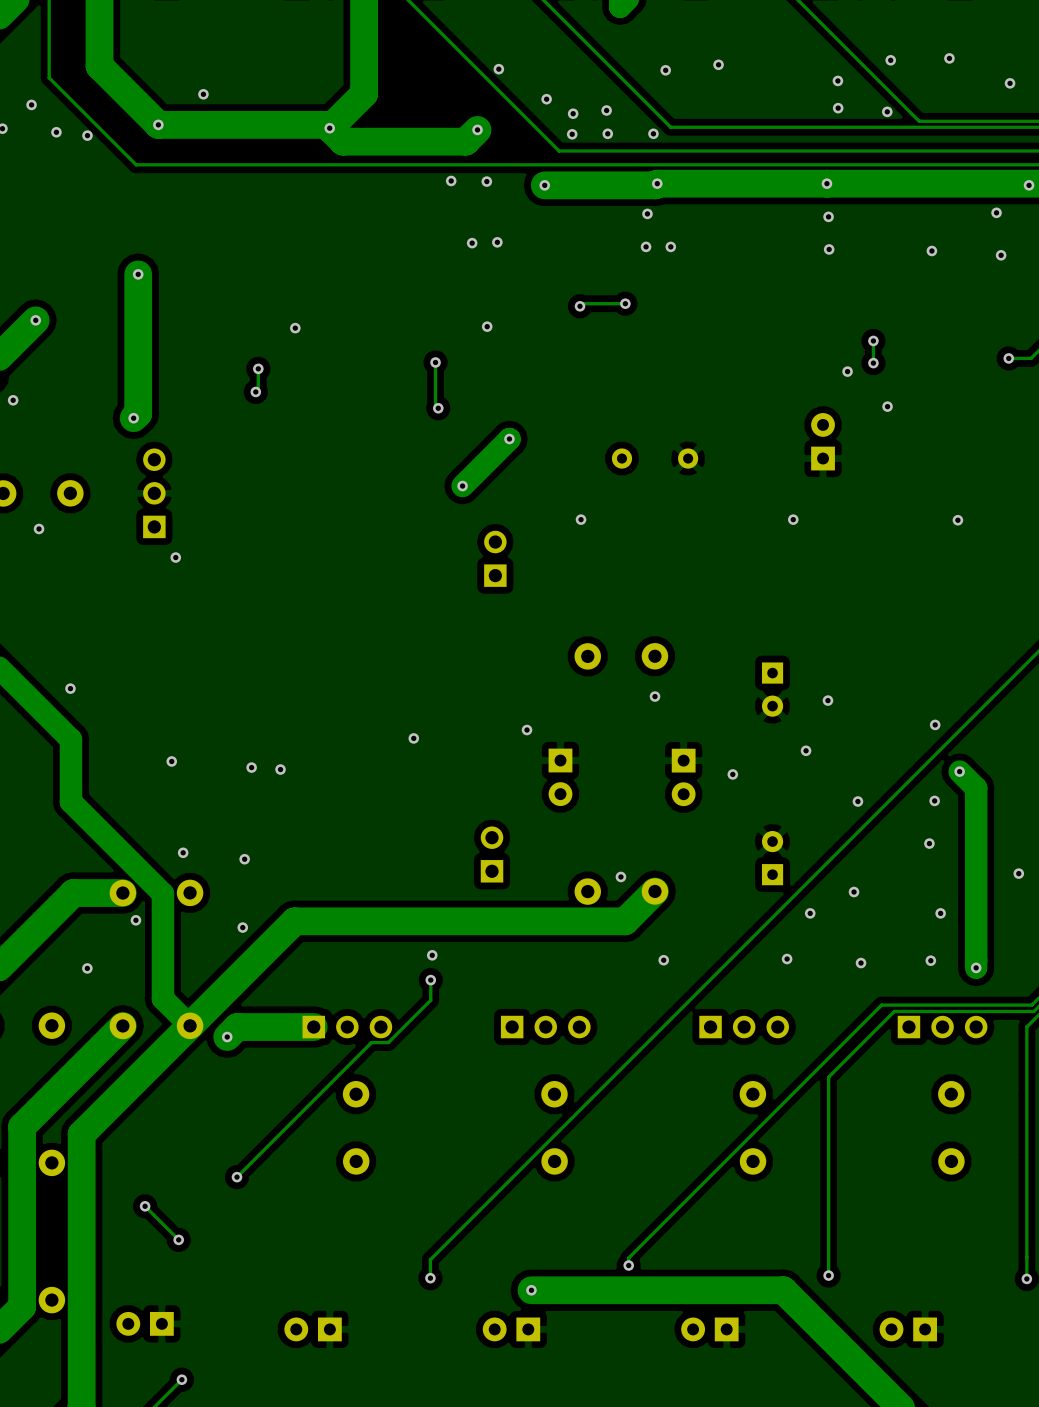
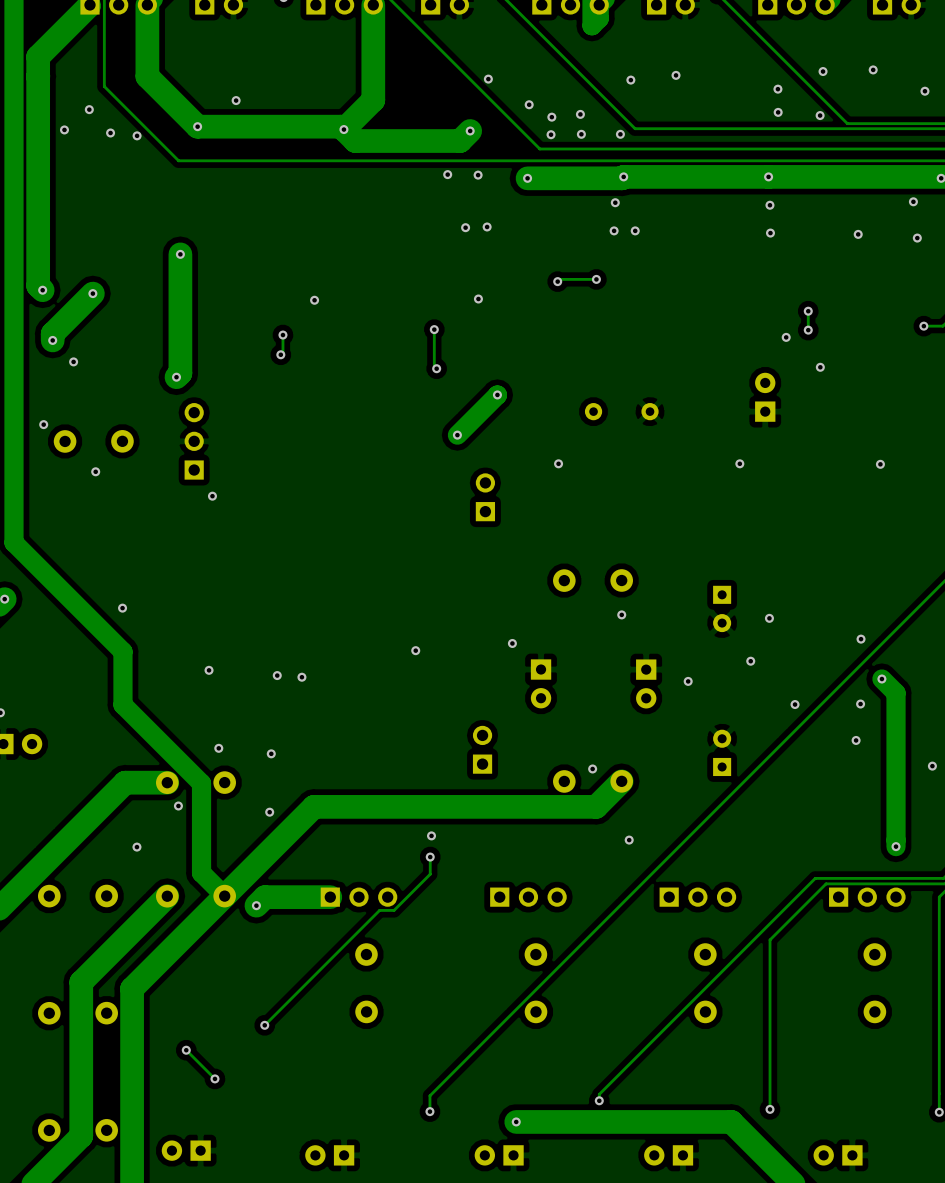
via: (854, 892) -> none
via: (810, 913) -> none
via: (940, 913) -> none
via: (787, 959) -> none
via: (930, 960) -> none
via: (861, 963) -> none

